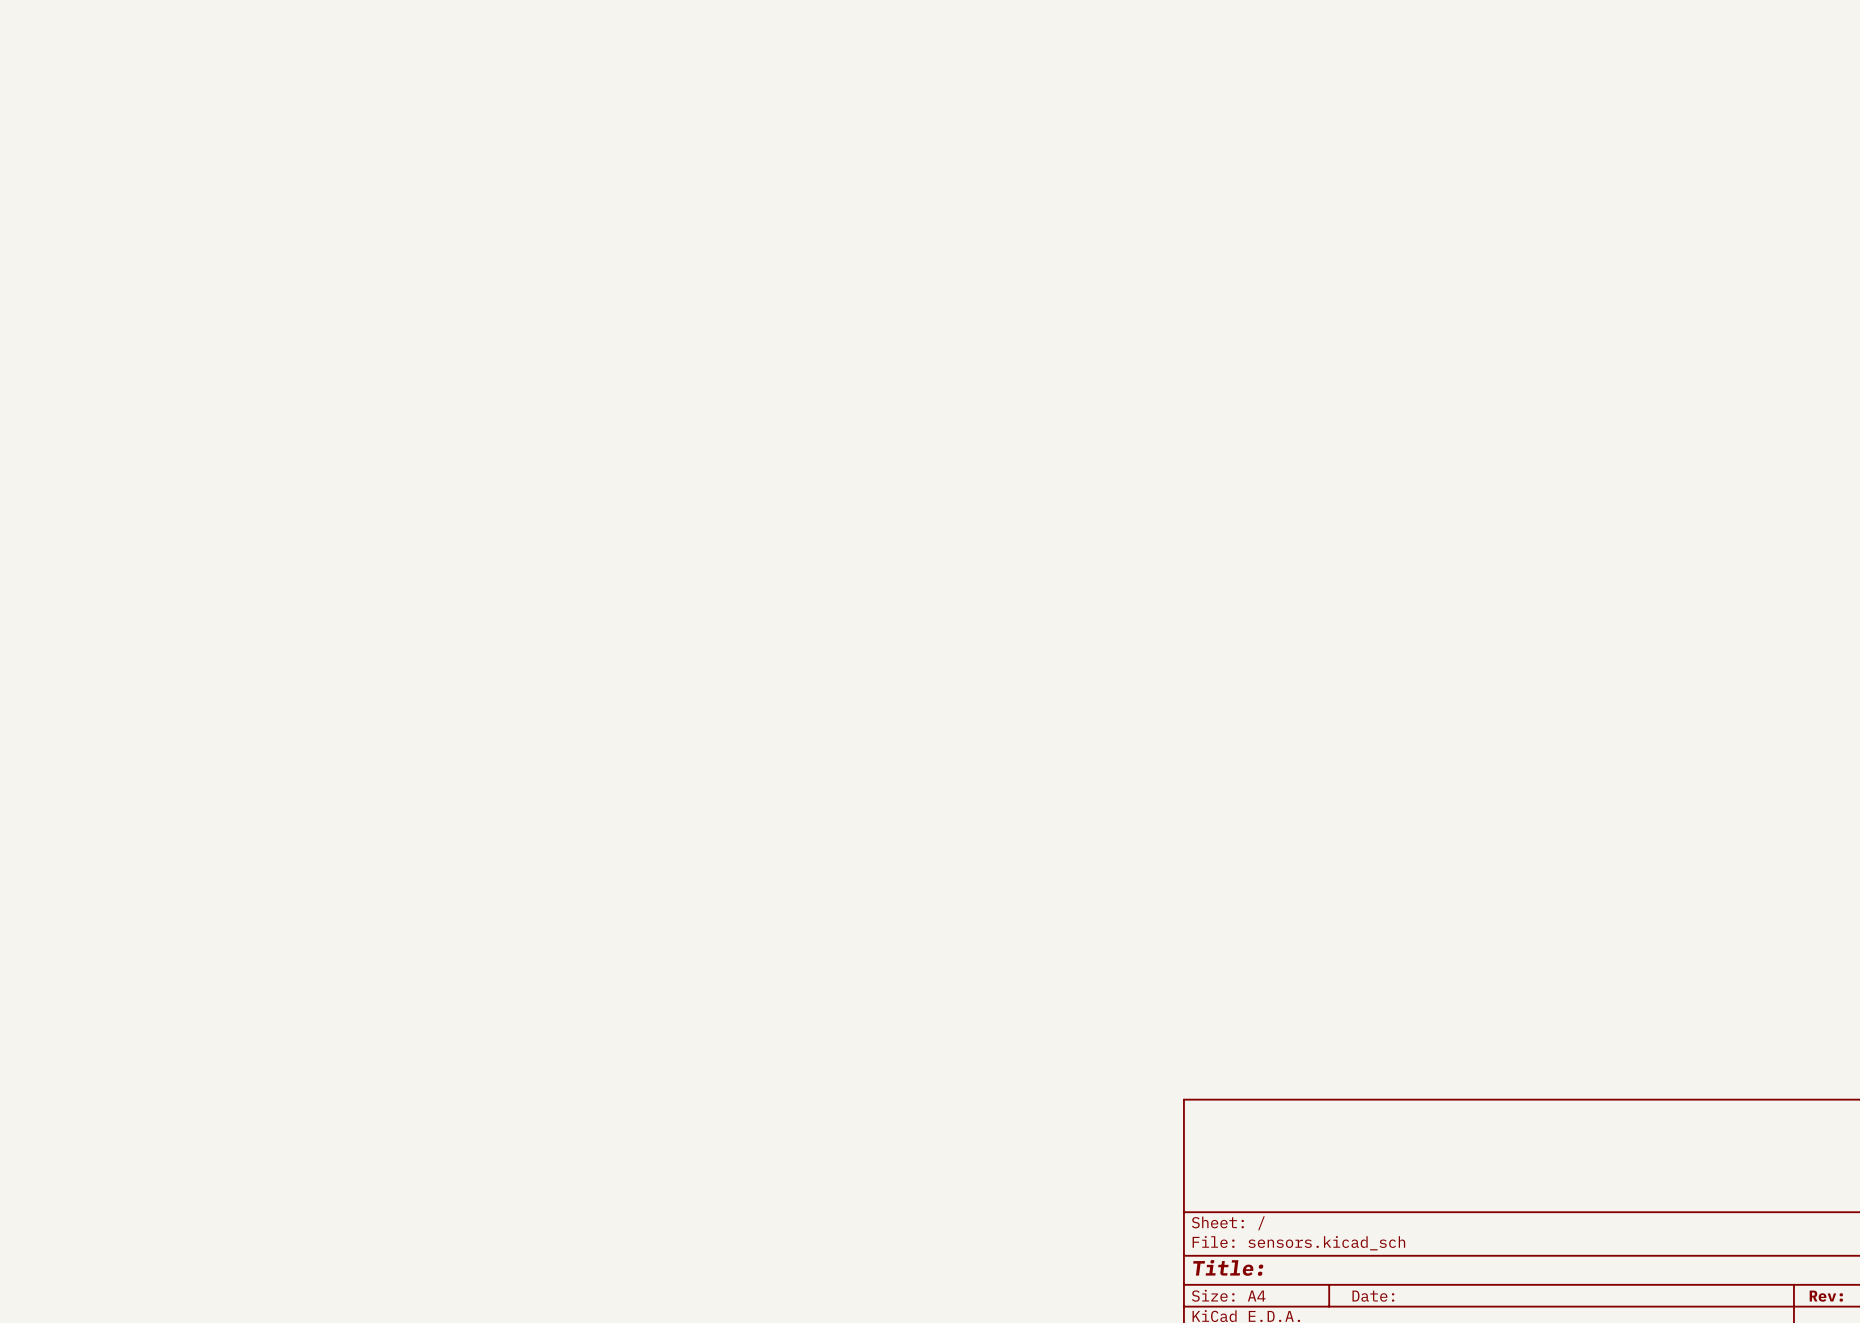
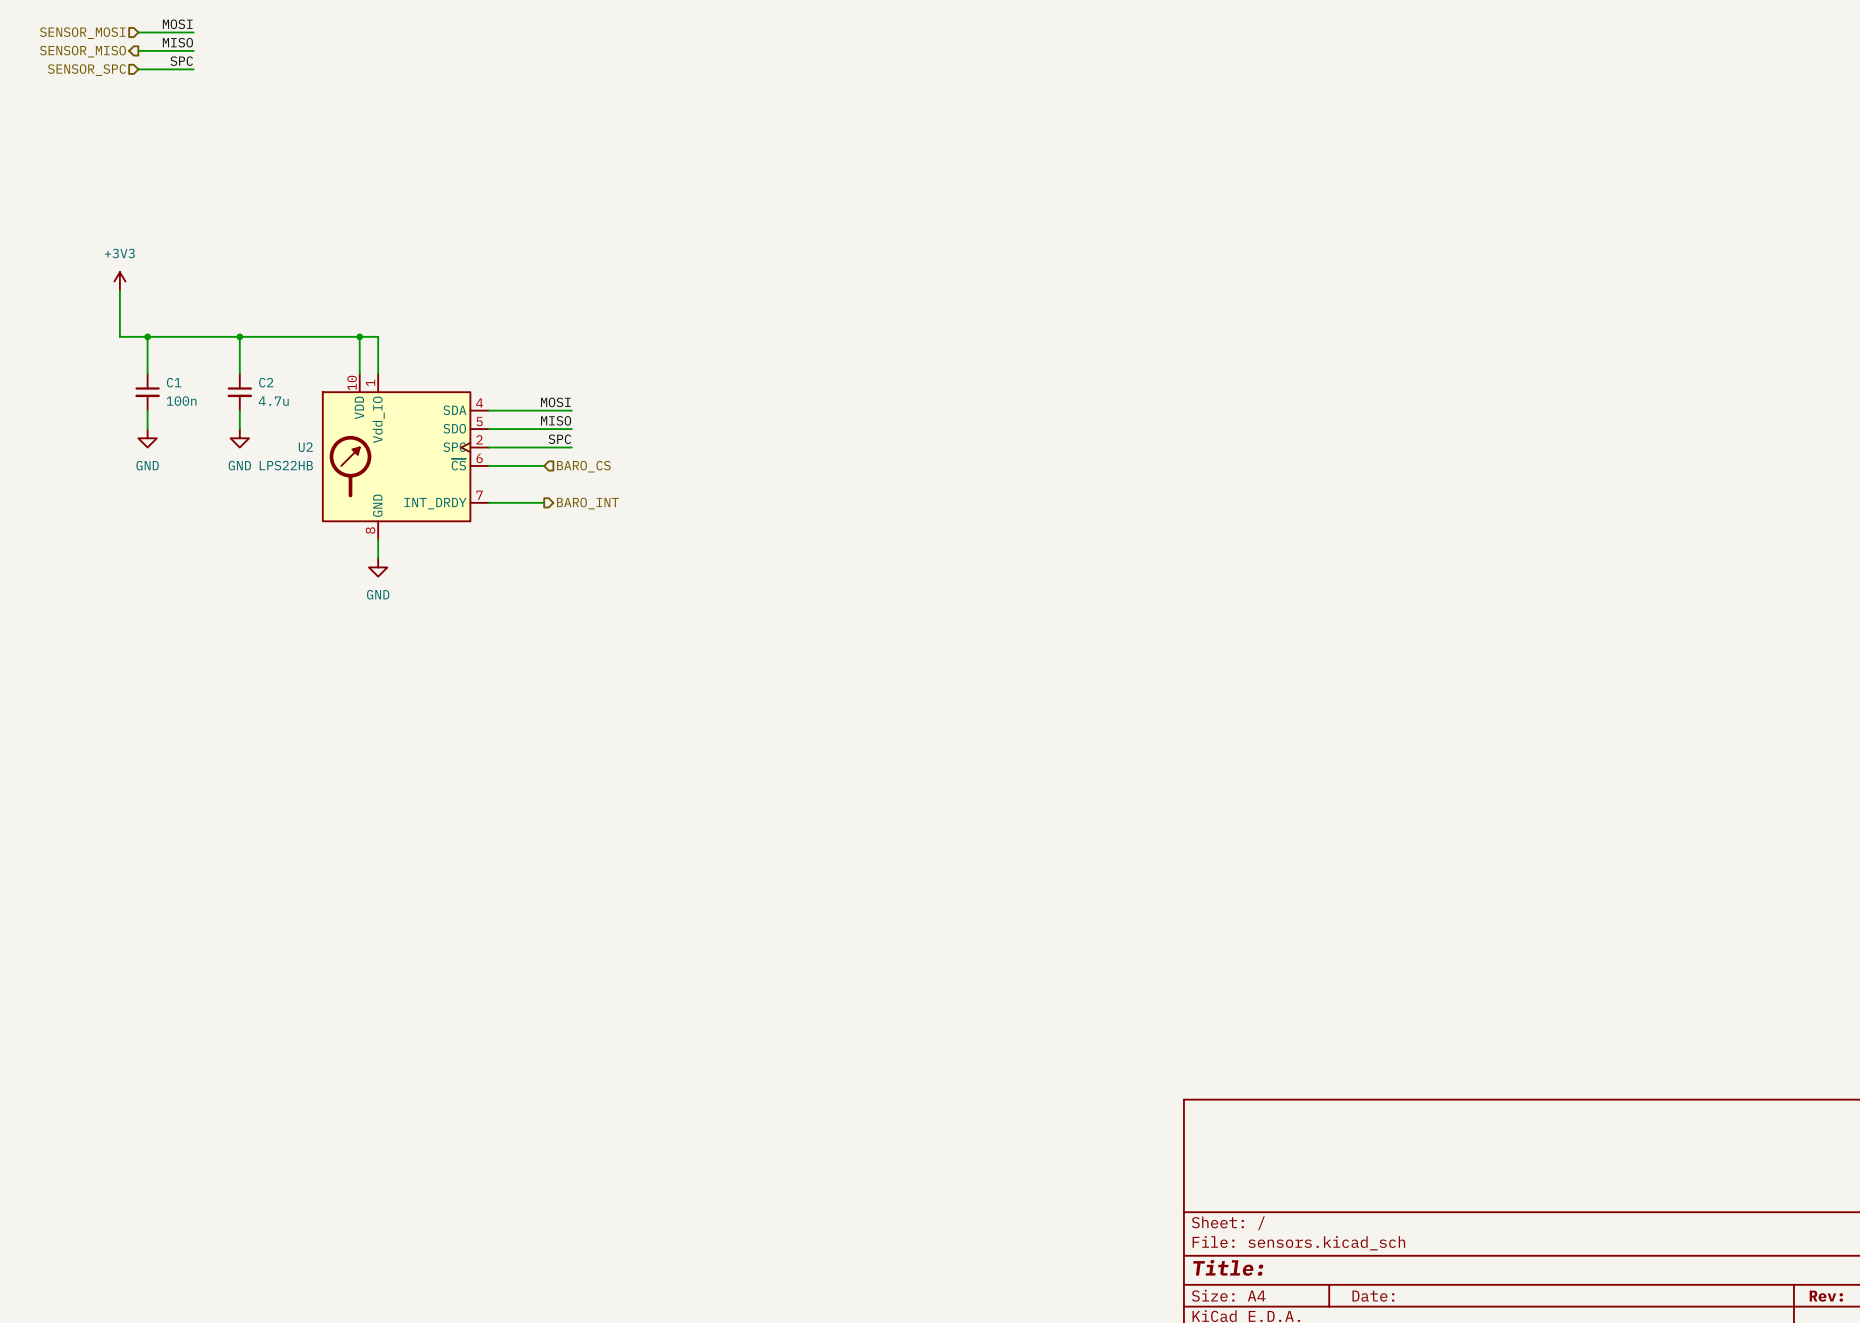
label: none -> MOSI (177, 24)
wire: none -> (138, 32) (193, 32)
hierarchical label: none -> SENSOR_MOSI (82, 33)
label: none -> MISO (177, 42)
wire: none -> (138, 50) (193, 50)
hierarchical label: none -> SENSOR_MISO (82, 51)
label: none -> SPC (181, 61)
wire: none -> (138, 69) (193, 69)
hierarchical label: none -> SENSOR_SPC (86, 70)
power symbol: none -> +3V3 (119, 281)
wire: none -> (119, 290) (119, 336) (378, 336) (378, 373)
wire: none -> (147, 336) (147, 373)
junction: none -> (147, 336)
wire: none -> (239, 336) (239, 373)
junction: none -> (239, 336)
wire: none -> (359, 336) (359, 373)
junction: none -> (359, 336)
C1: none -> 100n (147, 392)
C2: none -> 4.7u (239, 392)
label: none -> MOSI (555, 402)
wire: none -> (147, 410) (147, 429)
wire: none -> (239, 410) (239, 429)
wire: none -> (488, 410) (571, 410)
label: none -> MISO (556, 420)
wire: none -> (488, 429) (571, 429)
power symbol: none -> GND (147, 438)
power symbol: none -> GND (239, 438)
label: none -> SPC (559, 439)
wire: none -> (488, 447) (571, 447)
U2: none -> LPS22HB (405, 456)
wire: none -> (488, 465) (544, 465)
hierarchical label: none -> BARO_CS (583, 466)
wire: none -> (488, 502) (544, 502)
hierarchical label: none -> BARO_INT (588, 503)
wire: none -> (378, 539) (378, 558)
power symbol: none -> GND (378, 567)

